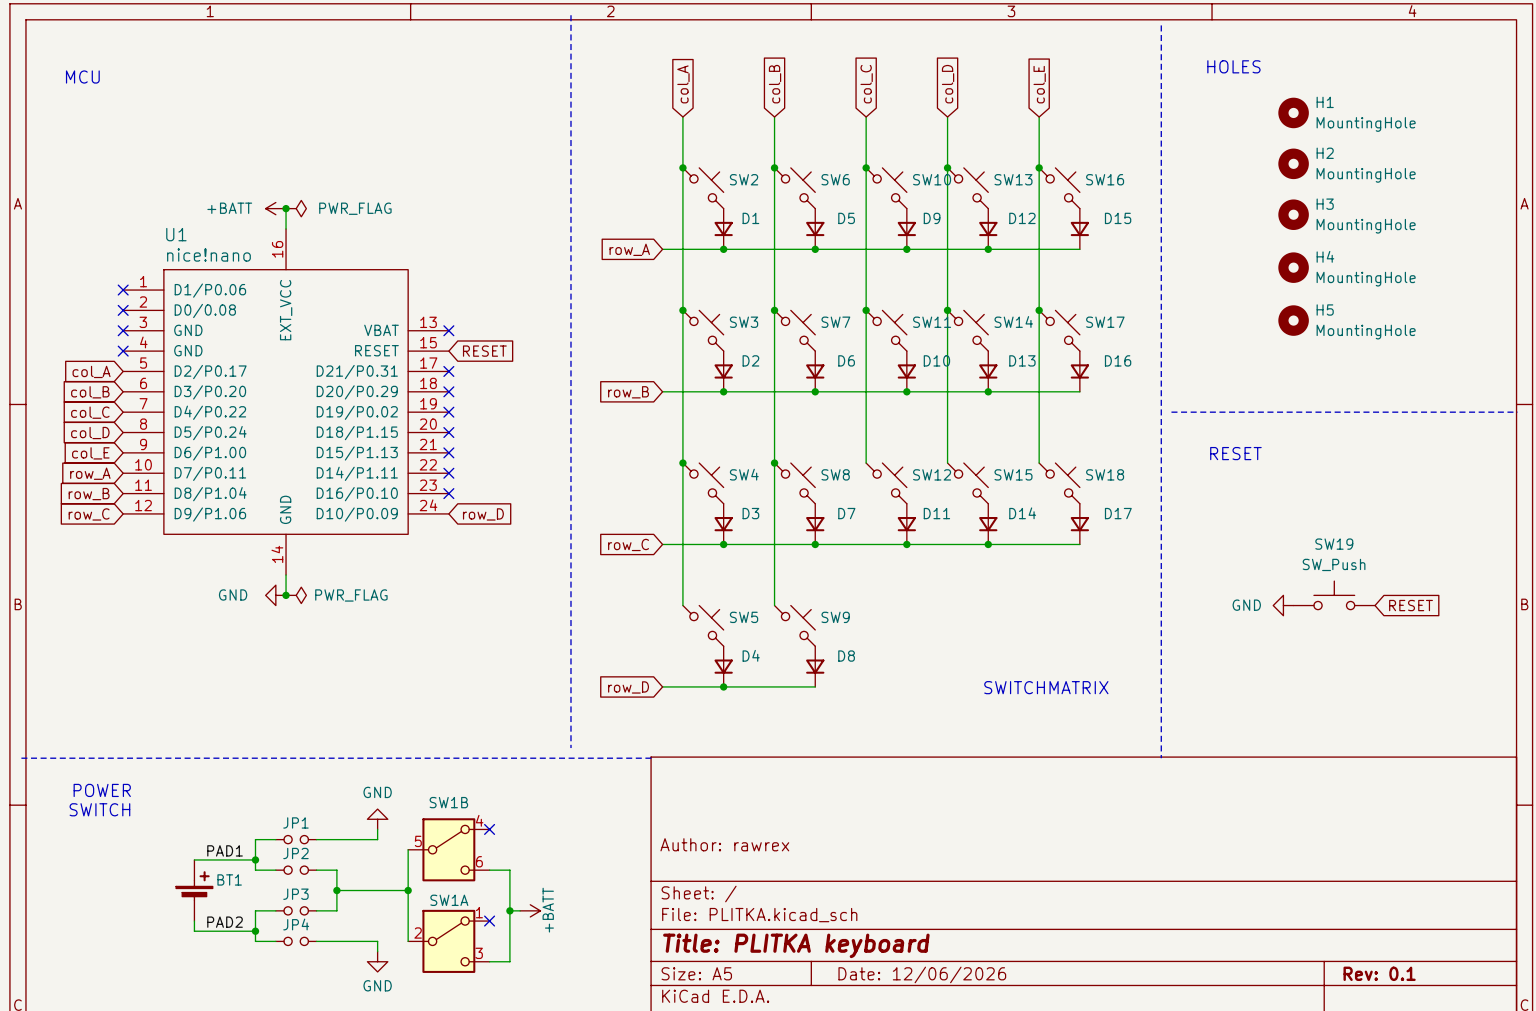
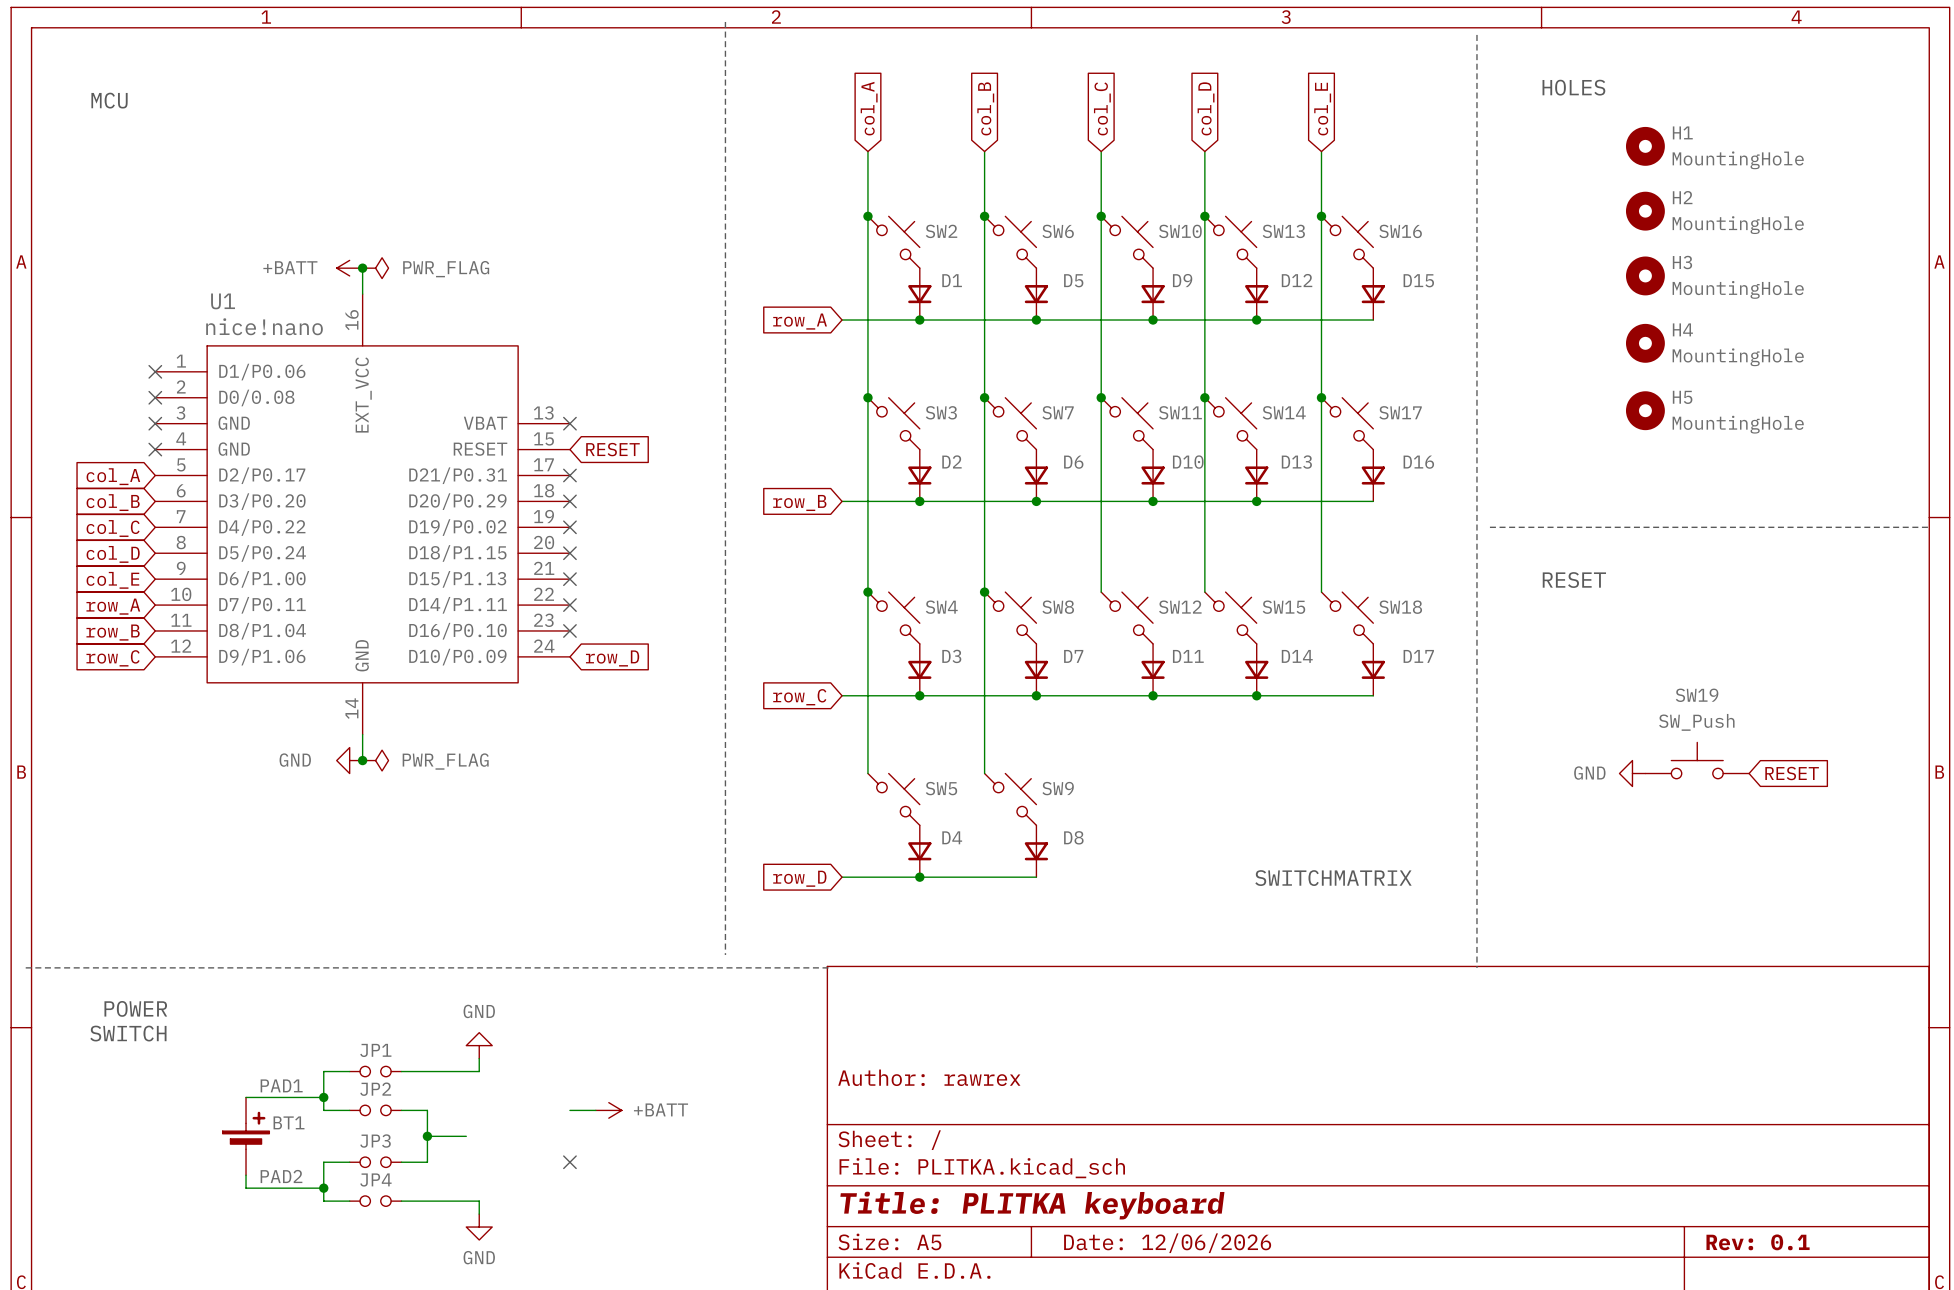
no-connect mark: (489, 829) -> none
wire: (408, 849) (408, 941) -> none
SW1B: (448, 849) -> none
wire: (489, 870) (509, 870) (509, 961) (489, 961) -> none
wire: (367, 890) (408, 890) -> none
junction: (408, 890) -> none
wire: (509, 910) (520, 910) -> none
junction: (509, 910) -> none
power symbol position: +BATT (530, 910) -> +BATT (608, 1110)
power symbol text rotation: 0° (548, 910) -> 90° clockwise (660, 1109)
no-connect mark position: (489, 921) -> (569, 1162)
SW1A: (448, 941) -> none

